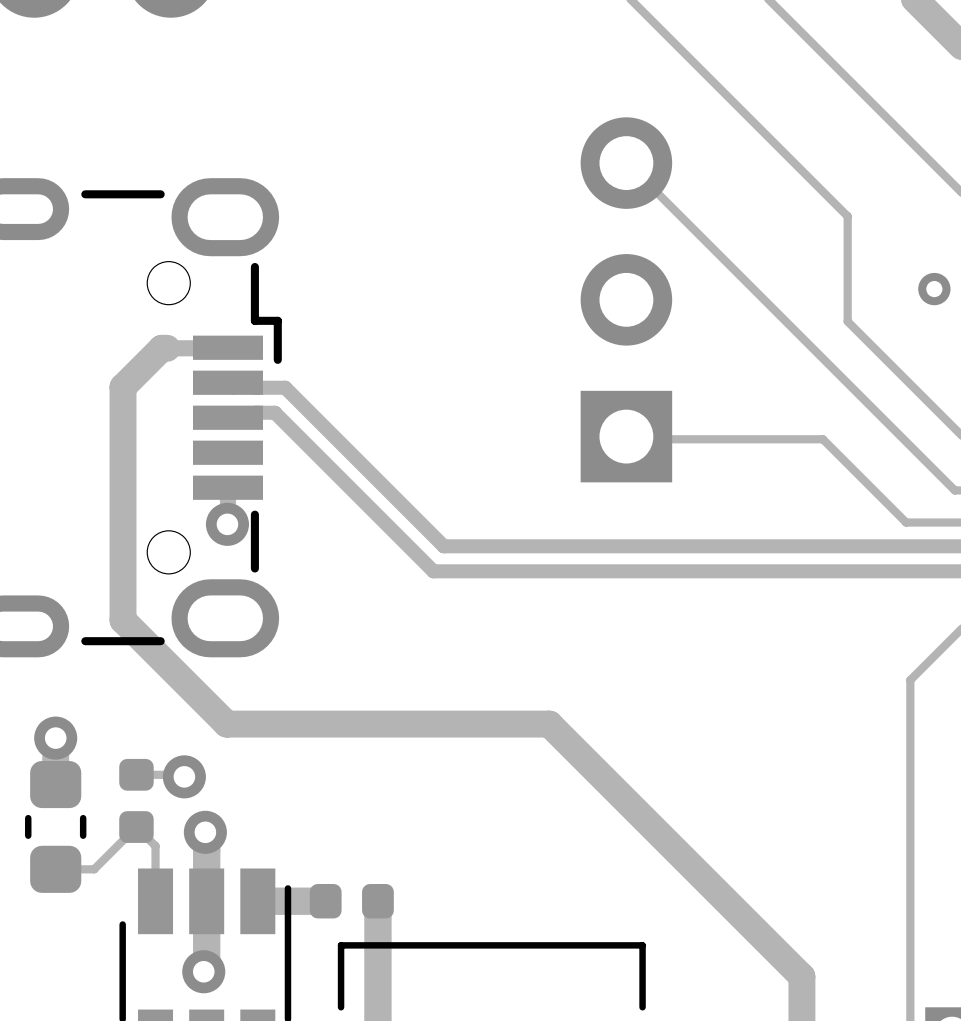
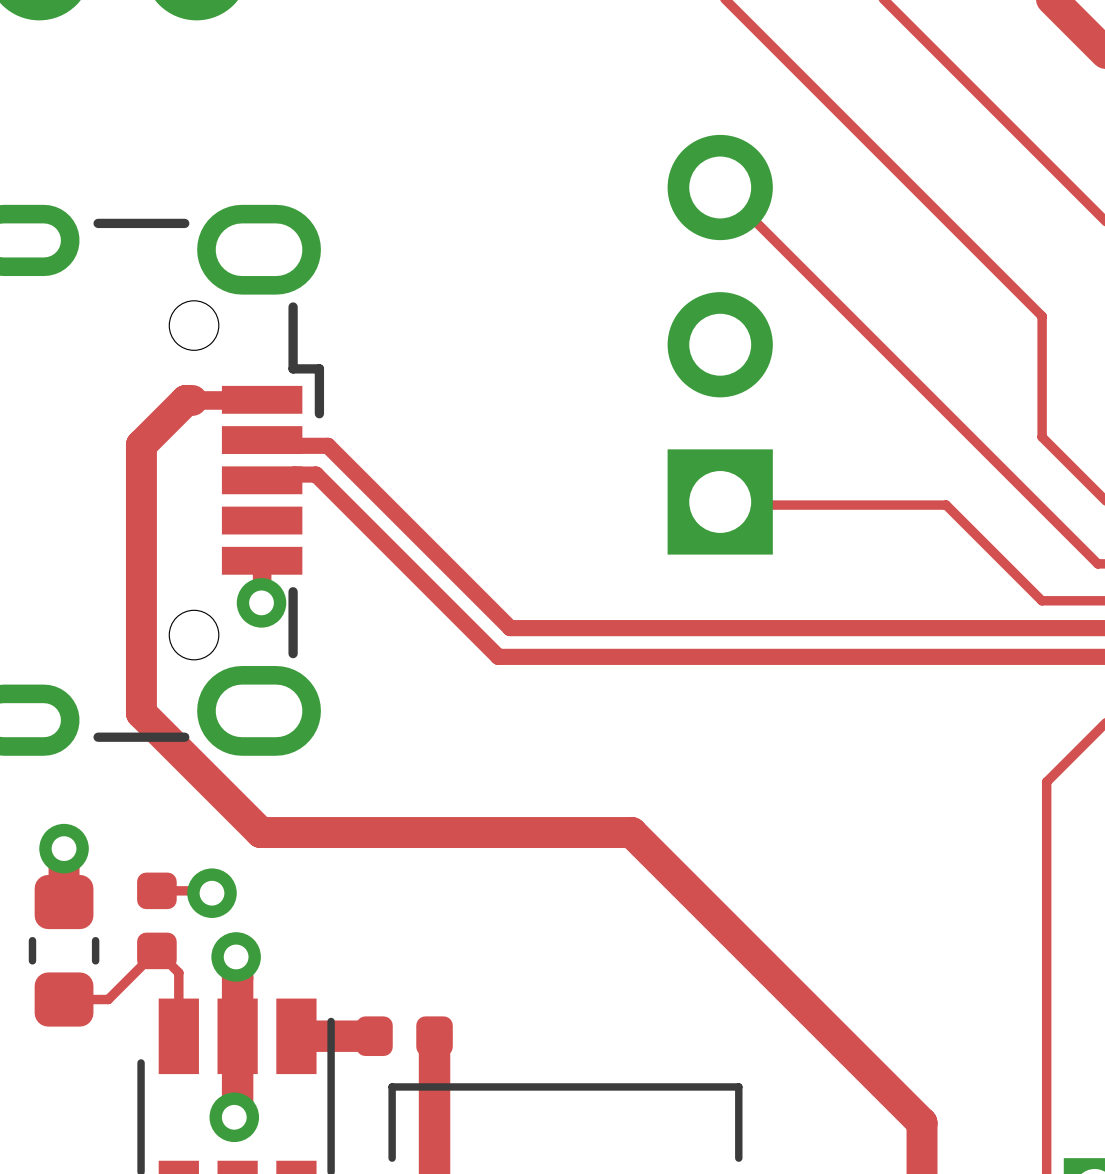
track: (847, 216) (847, 321) (906, 380) -> (974, 248) (1042, 316) (1042, 437)
via: (934, 289) -> none

